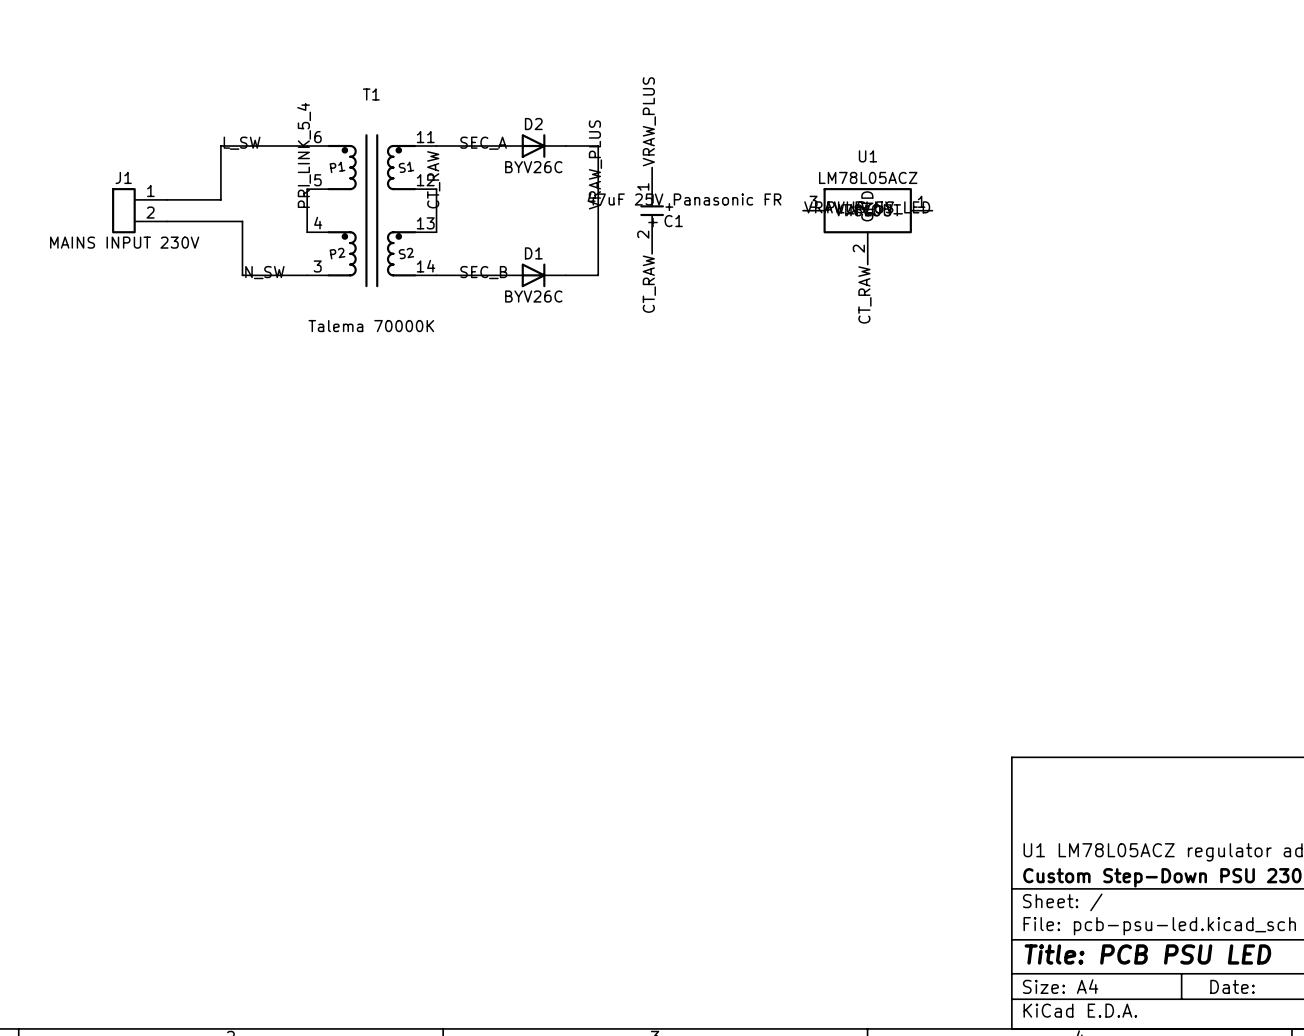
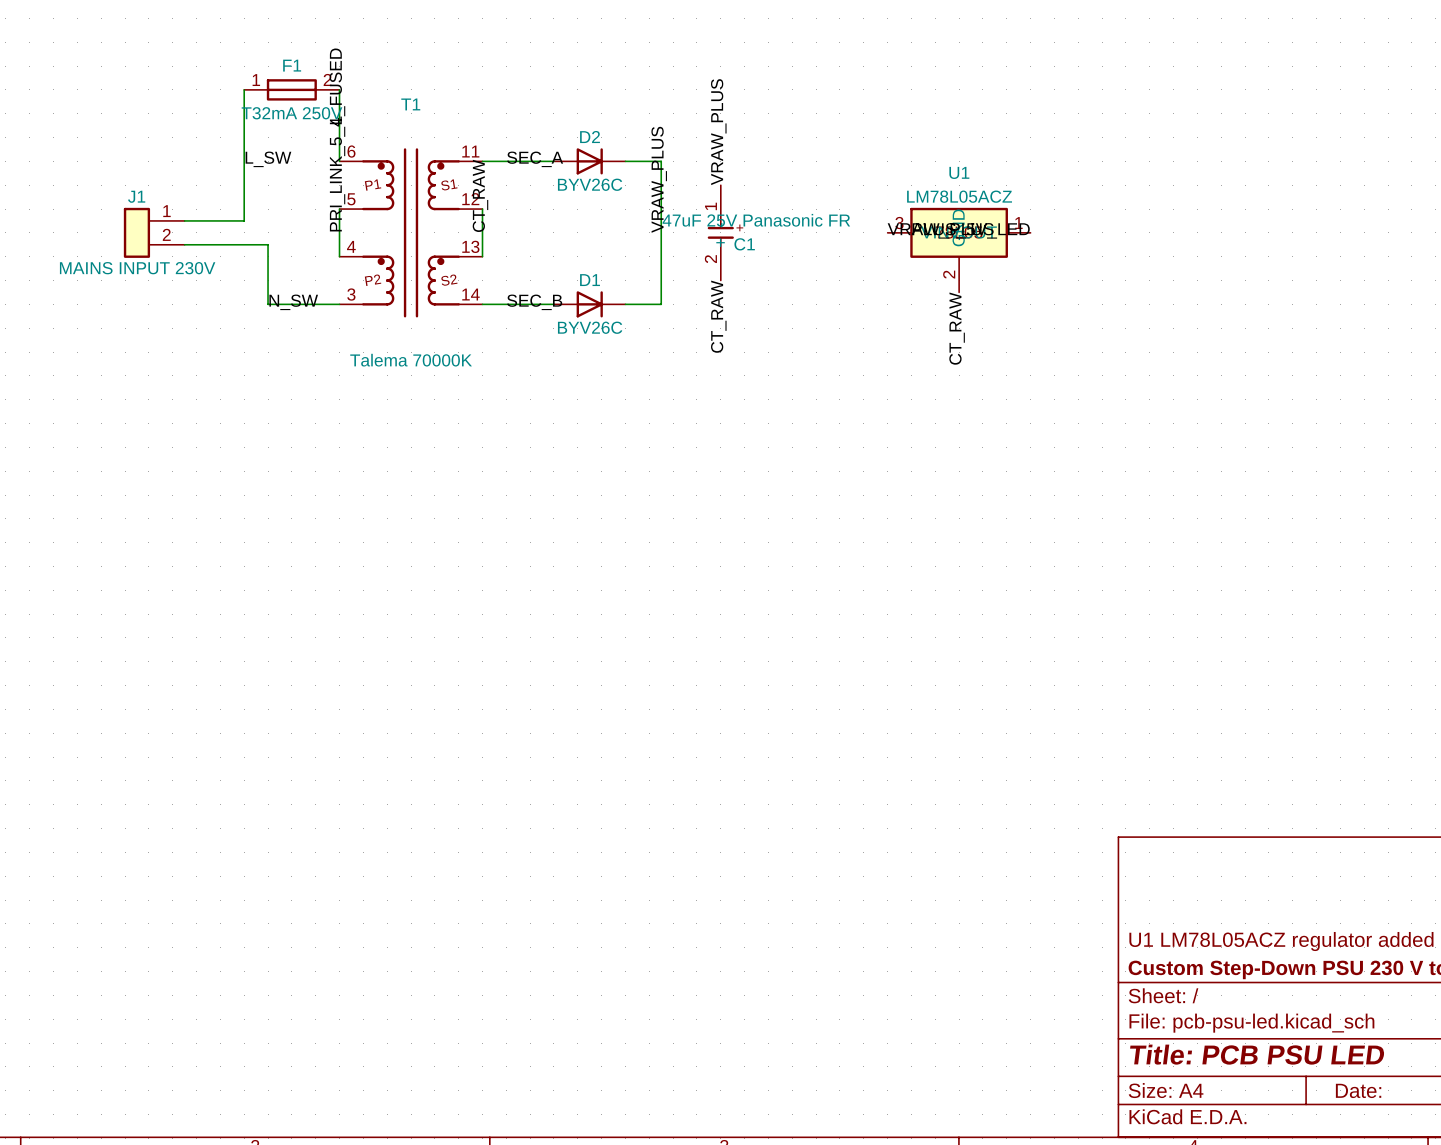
label: none -> L_FUSED (337, 86)
F1: none -> T32mA 250V (291, 89)
wire: none -> (339, 89) (339, 161)
wire: (220, 146) (307, 146) -> (244, 161) (244, 89)

